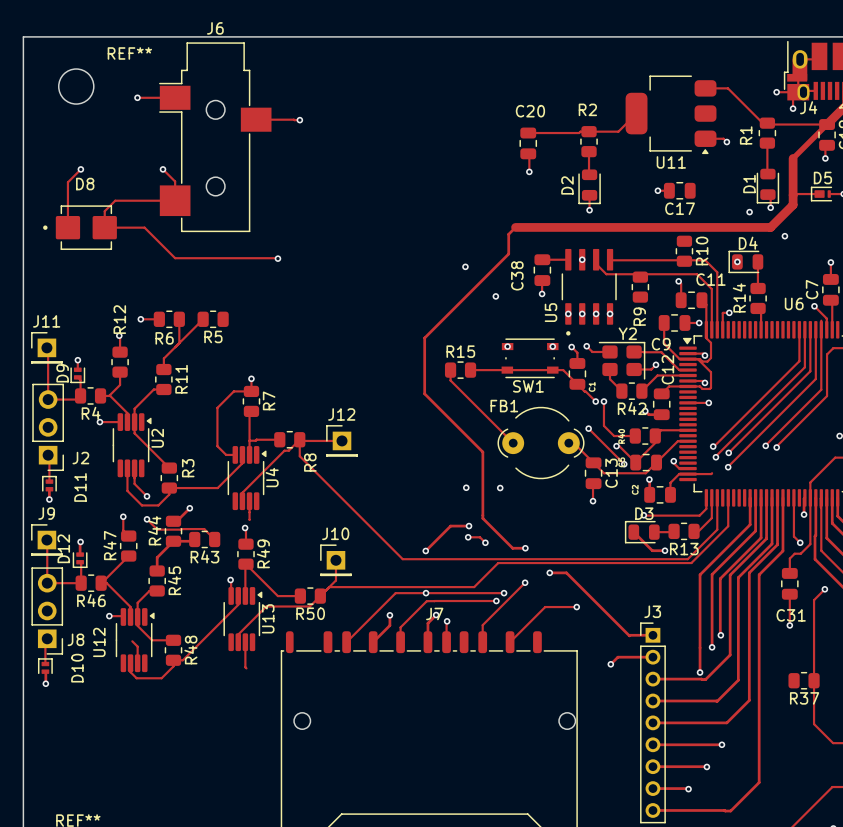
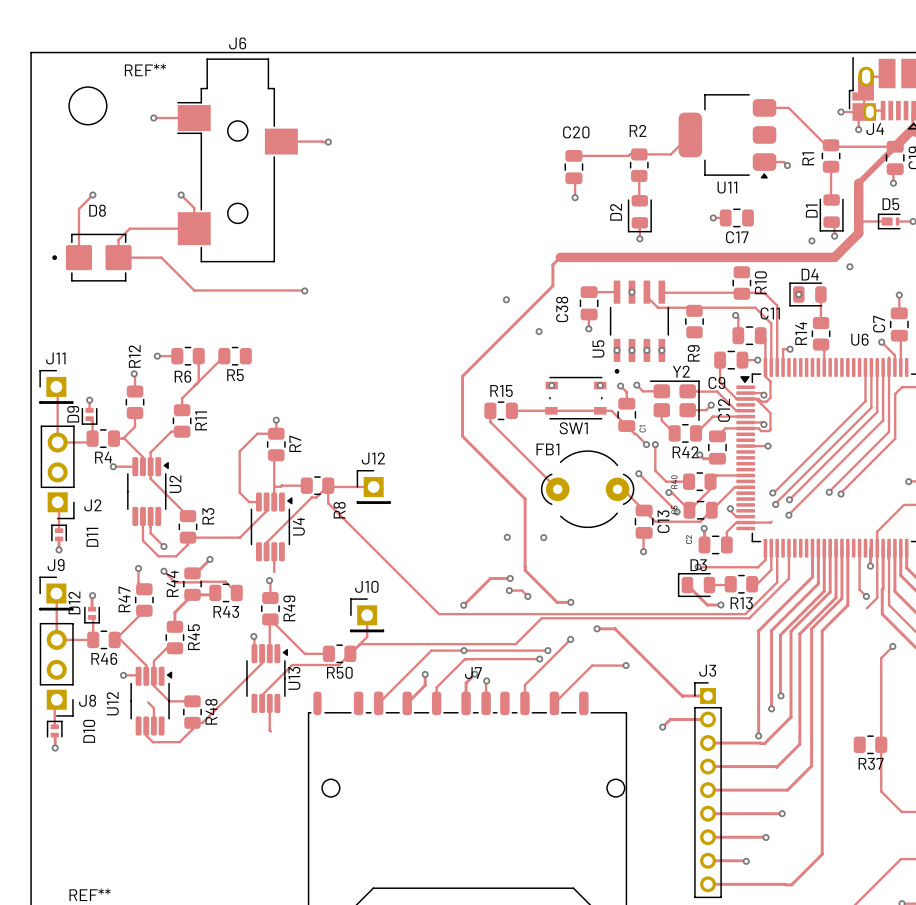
track: (800, 553) (794, 553) (789, 558) (789, 573) -> none
C31: (789, 583) -> none
track: (789, 594) (789, 625) -> none
via: (789, 625) -> none

